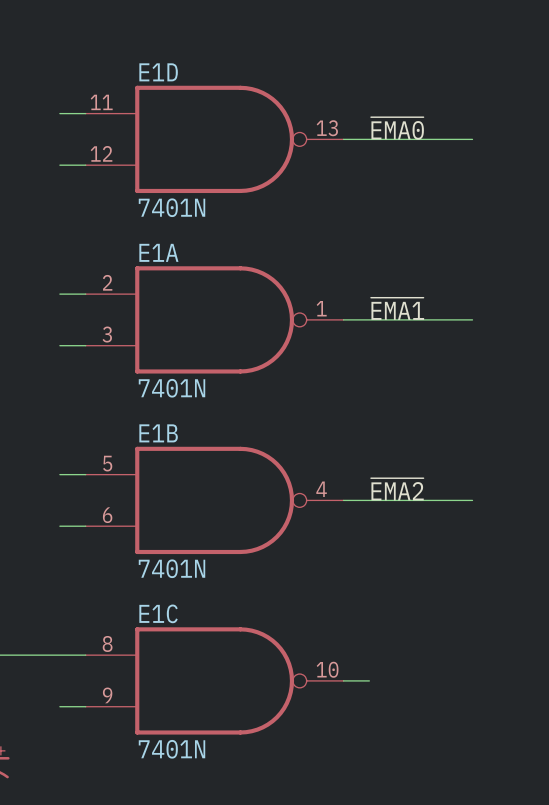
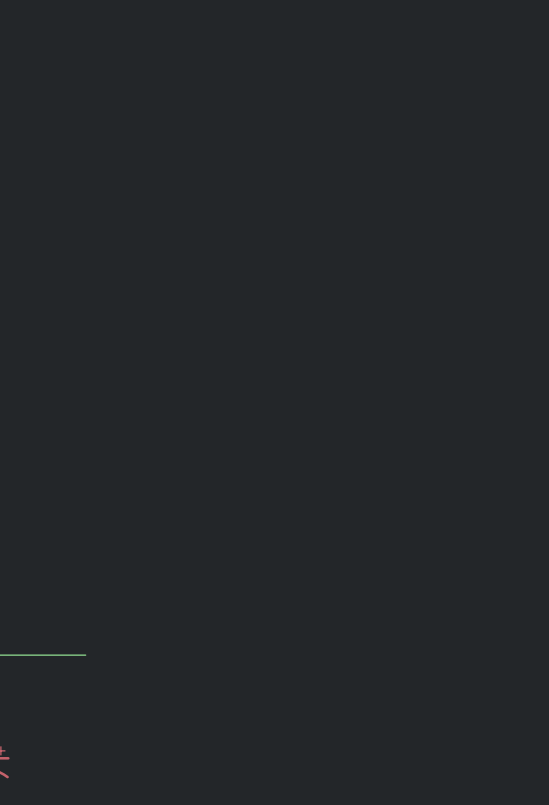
wire: (59, 113) (85, 113) -> none
label: ~{EMA0} (397, 128) -> none
E1D: 7401N (214, 139) -> none
wire: (343, 139) (472, 139) -> none
wire: (59, 165) (85, 165) -> none
wire: (59, 294) (85, 294) -> none
label: ~{EMA1} (397, 308) -> none
E1A: 7401N (214, 319) -> none
wire: (343, 319) (472, 319) -> none
wire: (59, 345) (85, 345) -> none
wire: (59, 474) (85, 474) -> none
label: ~{EMA2} (397, 489) -> none
E1B: 7401N (214, 500) -> none
wire: (343, 500) (472, 500) -> none
wire: (59, 526) (85, 526) -> none
E1C: 7401N (214, 680) -> none
wire: (343, 680) (369, 680) -> none
wire: (59, 706) (85, 706) -> none

